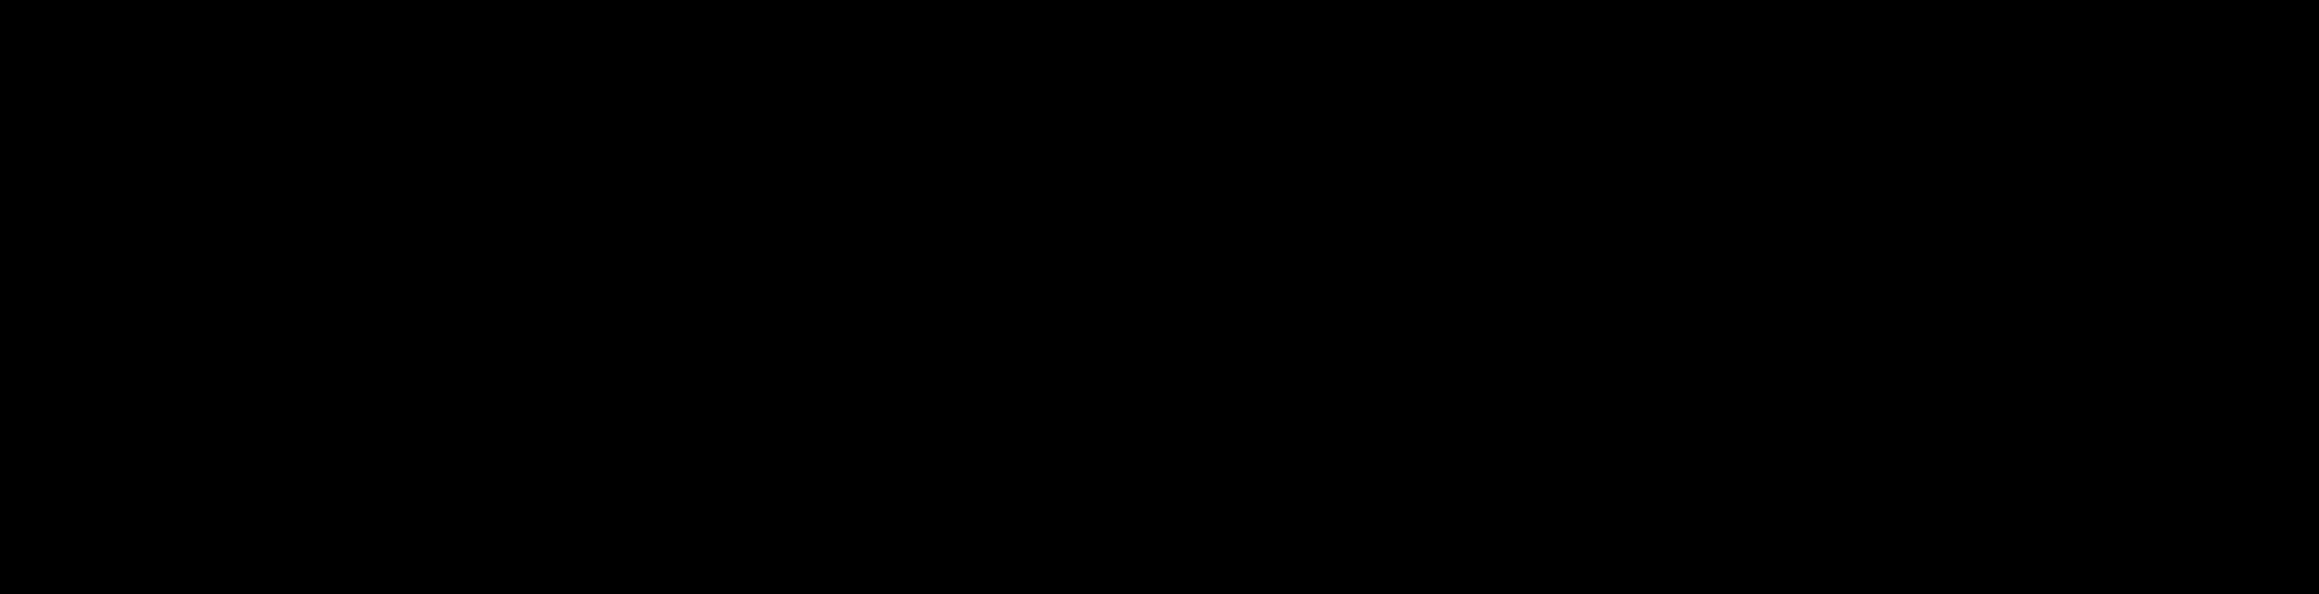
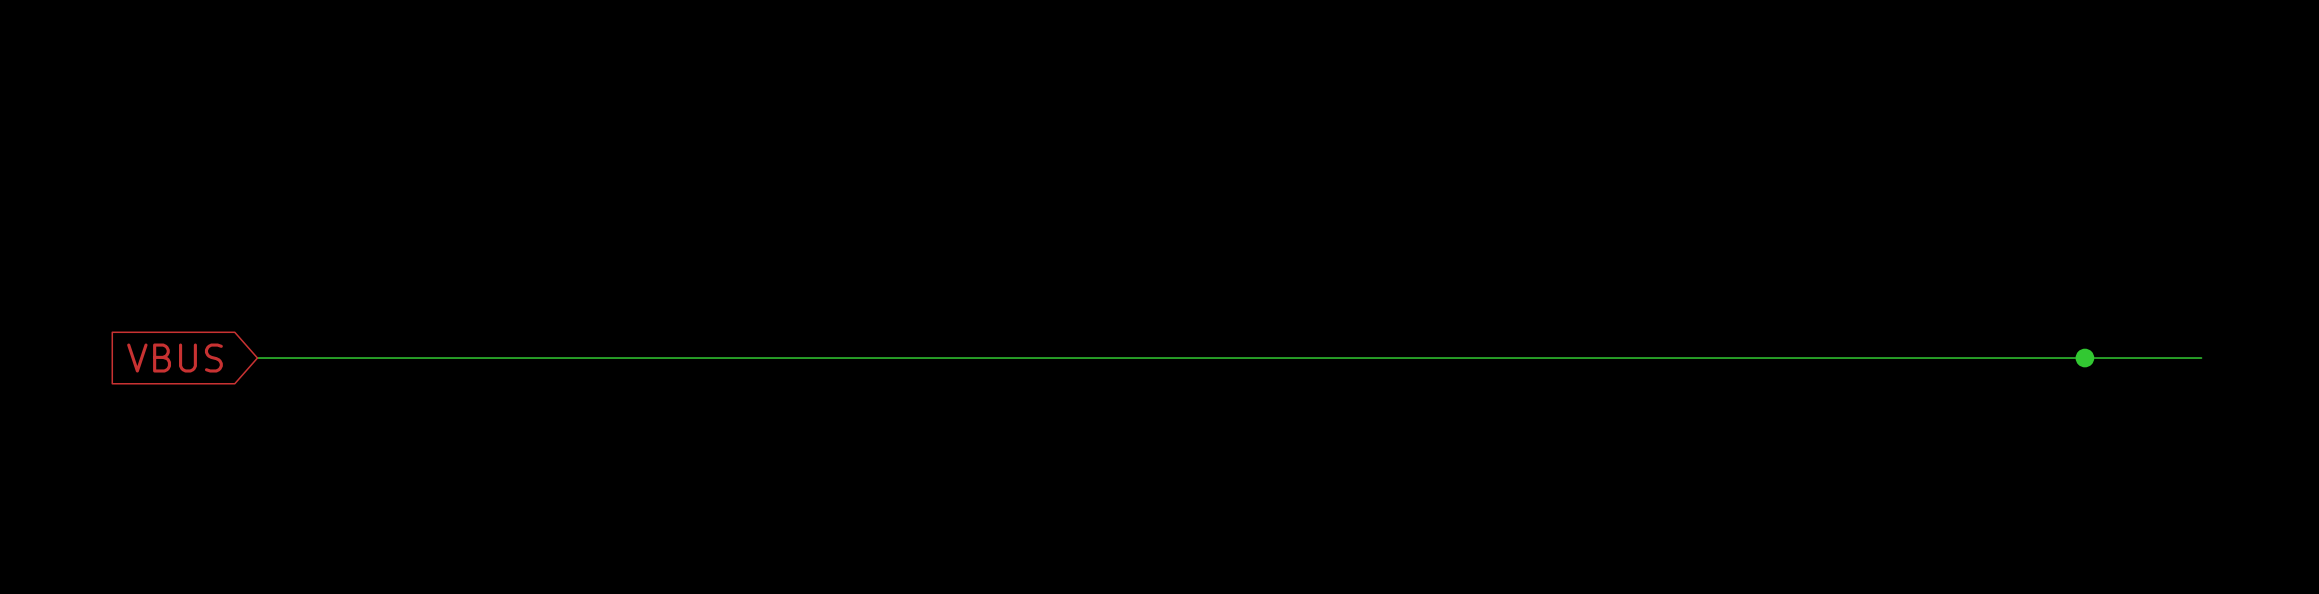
global label: none -> VBUS (175, 358)
wire: none -> (257, 358) (2201, 358)
junction: none -> (2084, 358)

